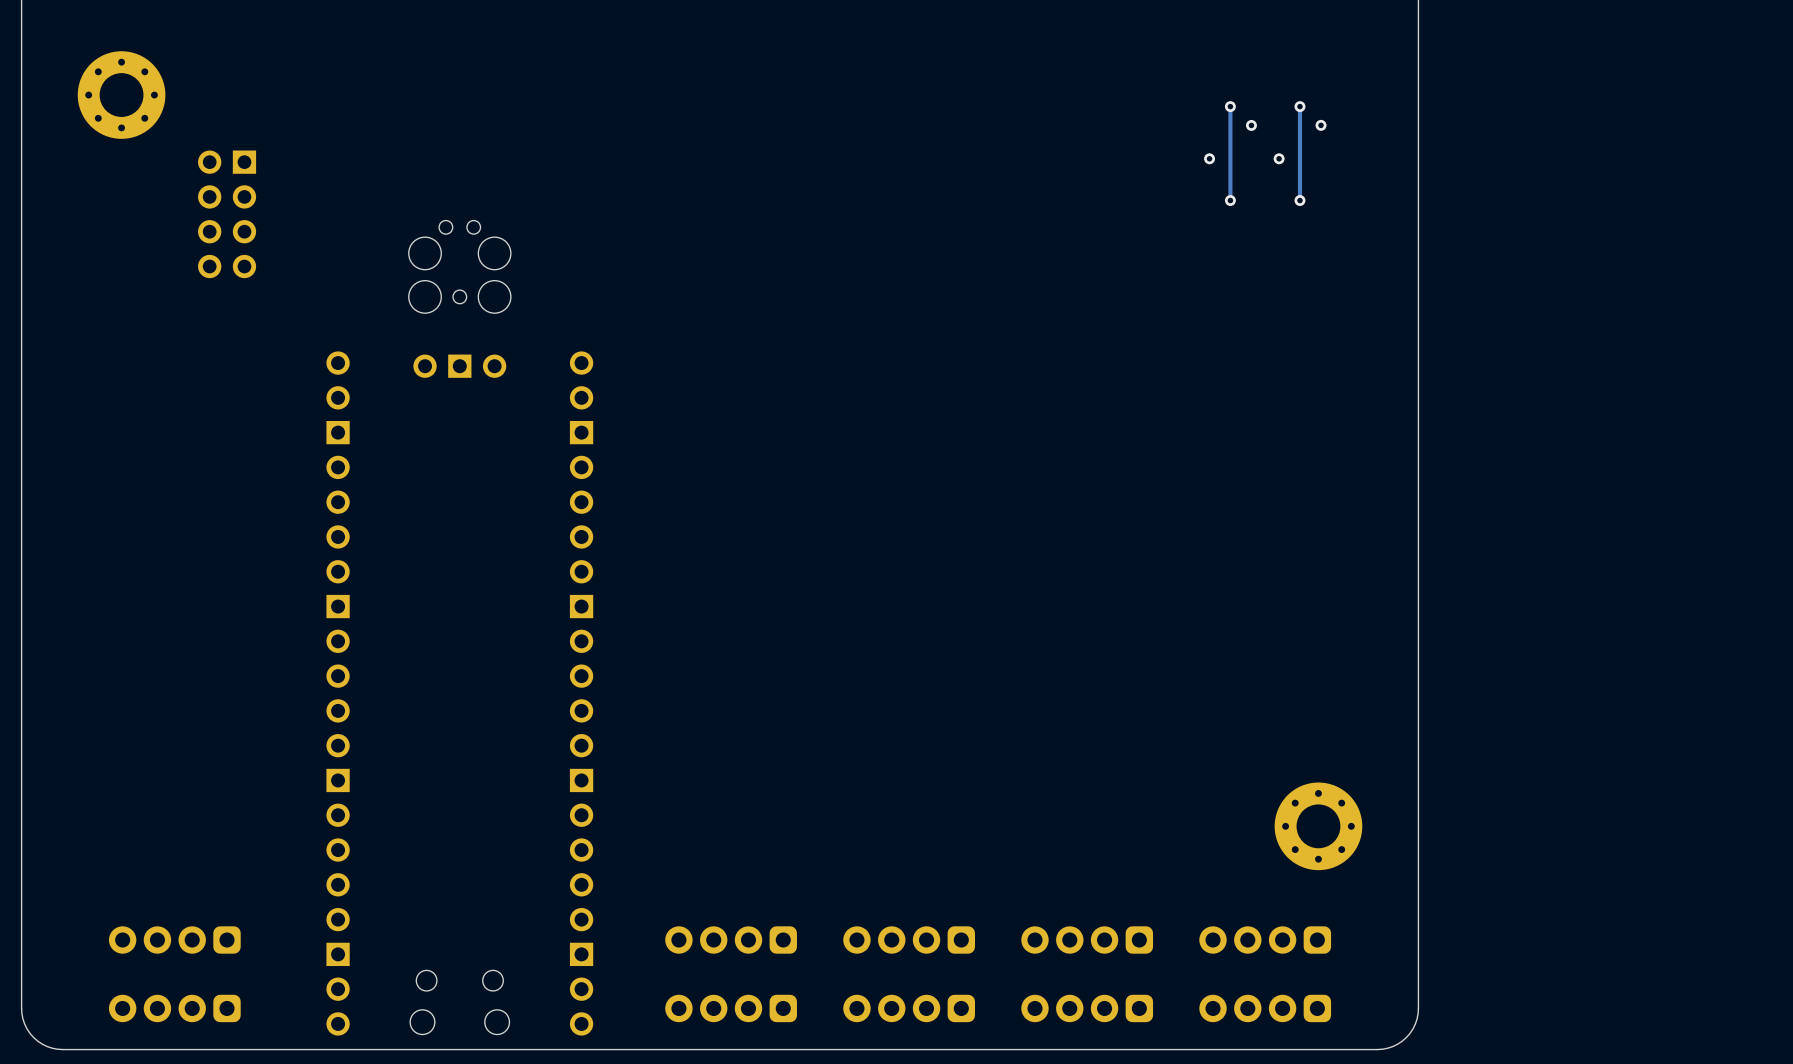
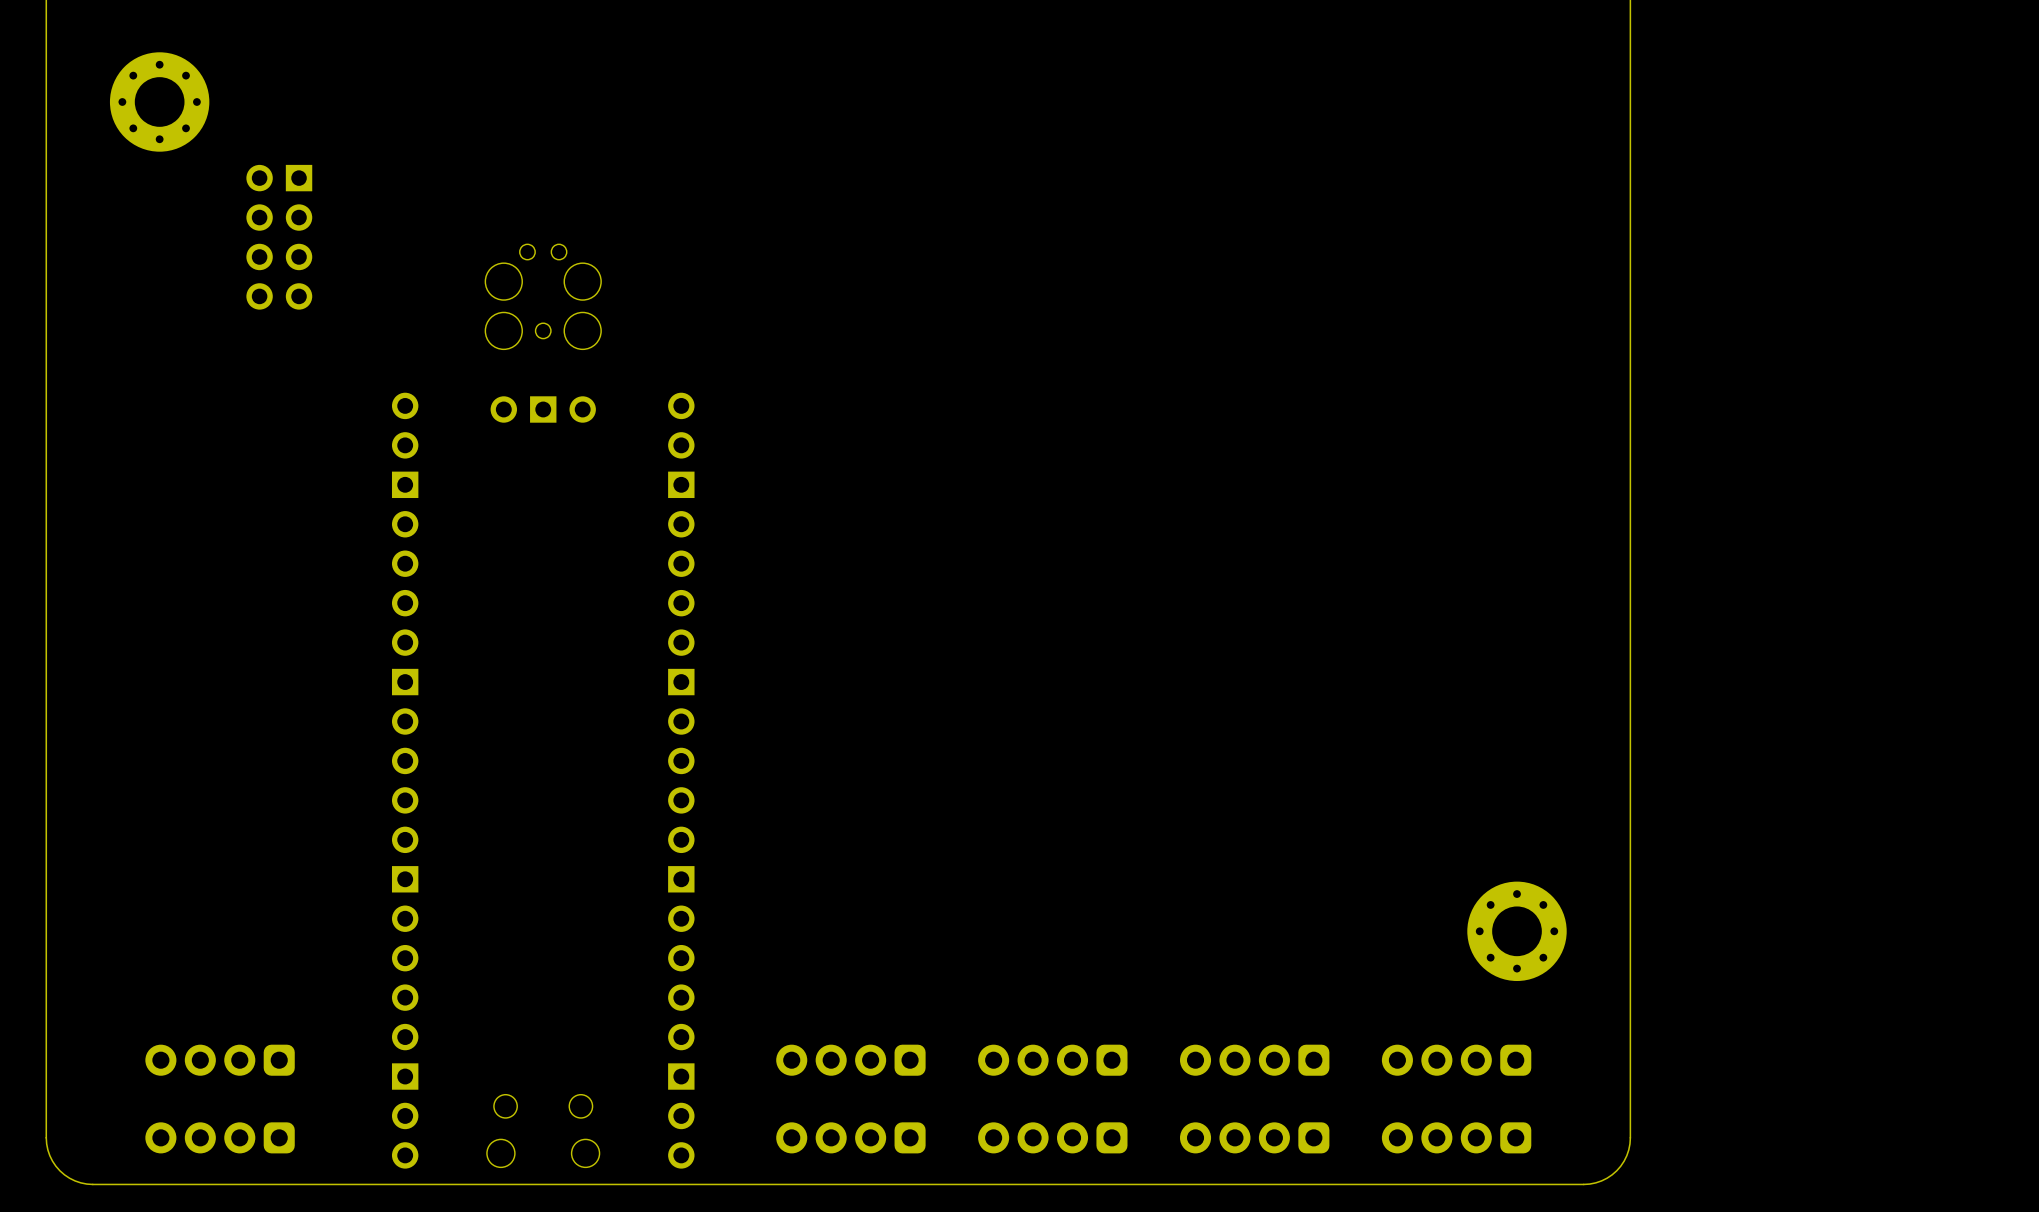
track: (1230, 106) (1230, 200) -> none
via: (1230, 106) -> none
track: (1299, 106) (1299, 200) -> none
via: (1299, 106) -> none
via: (1251, 125) -> none
via: (1321, 125) -> none
via: (1209, 158) -> none
via: (1279, 158) -> none
via: (1230, 200) -> none
via: (1299, 200) -> none

